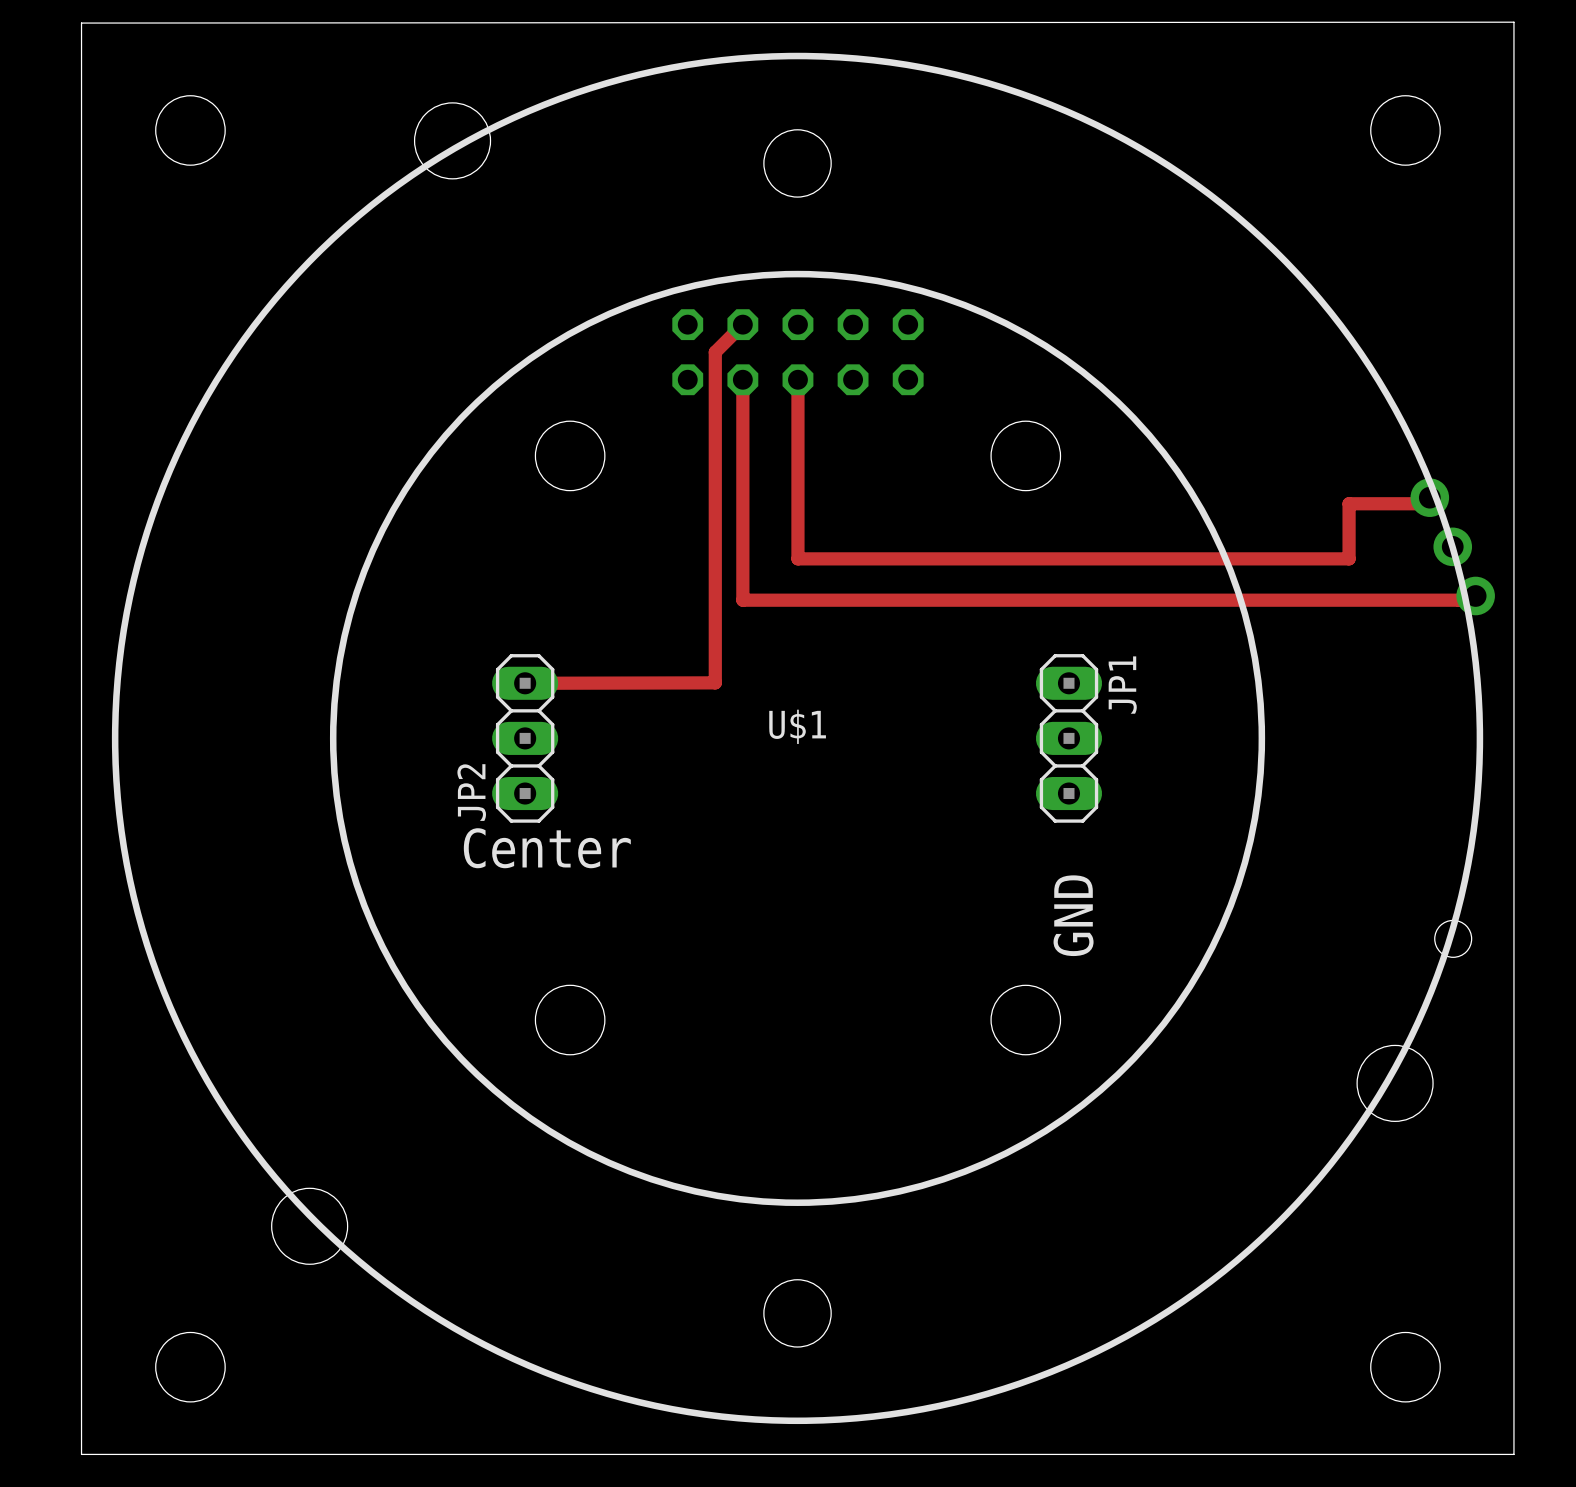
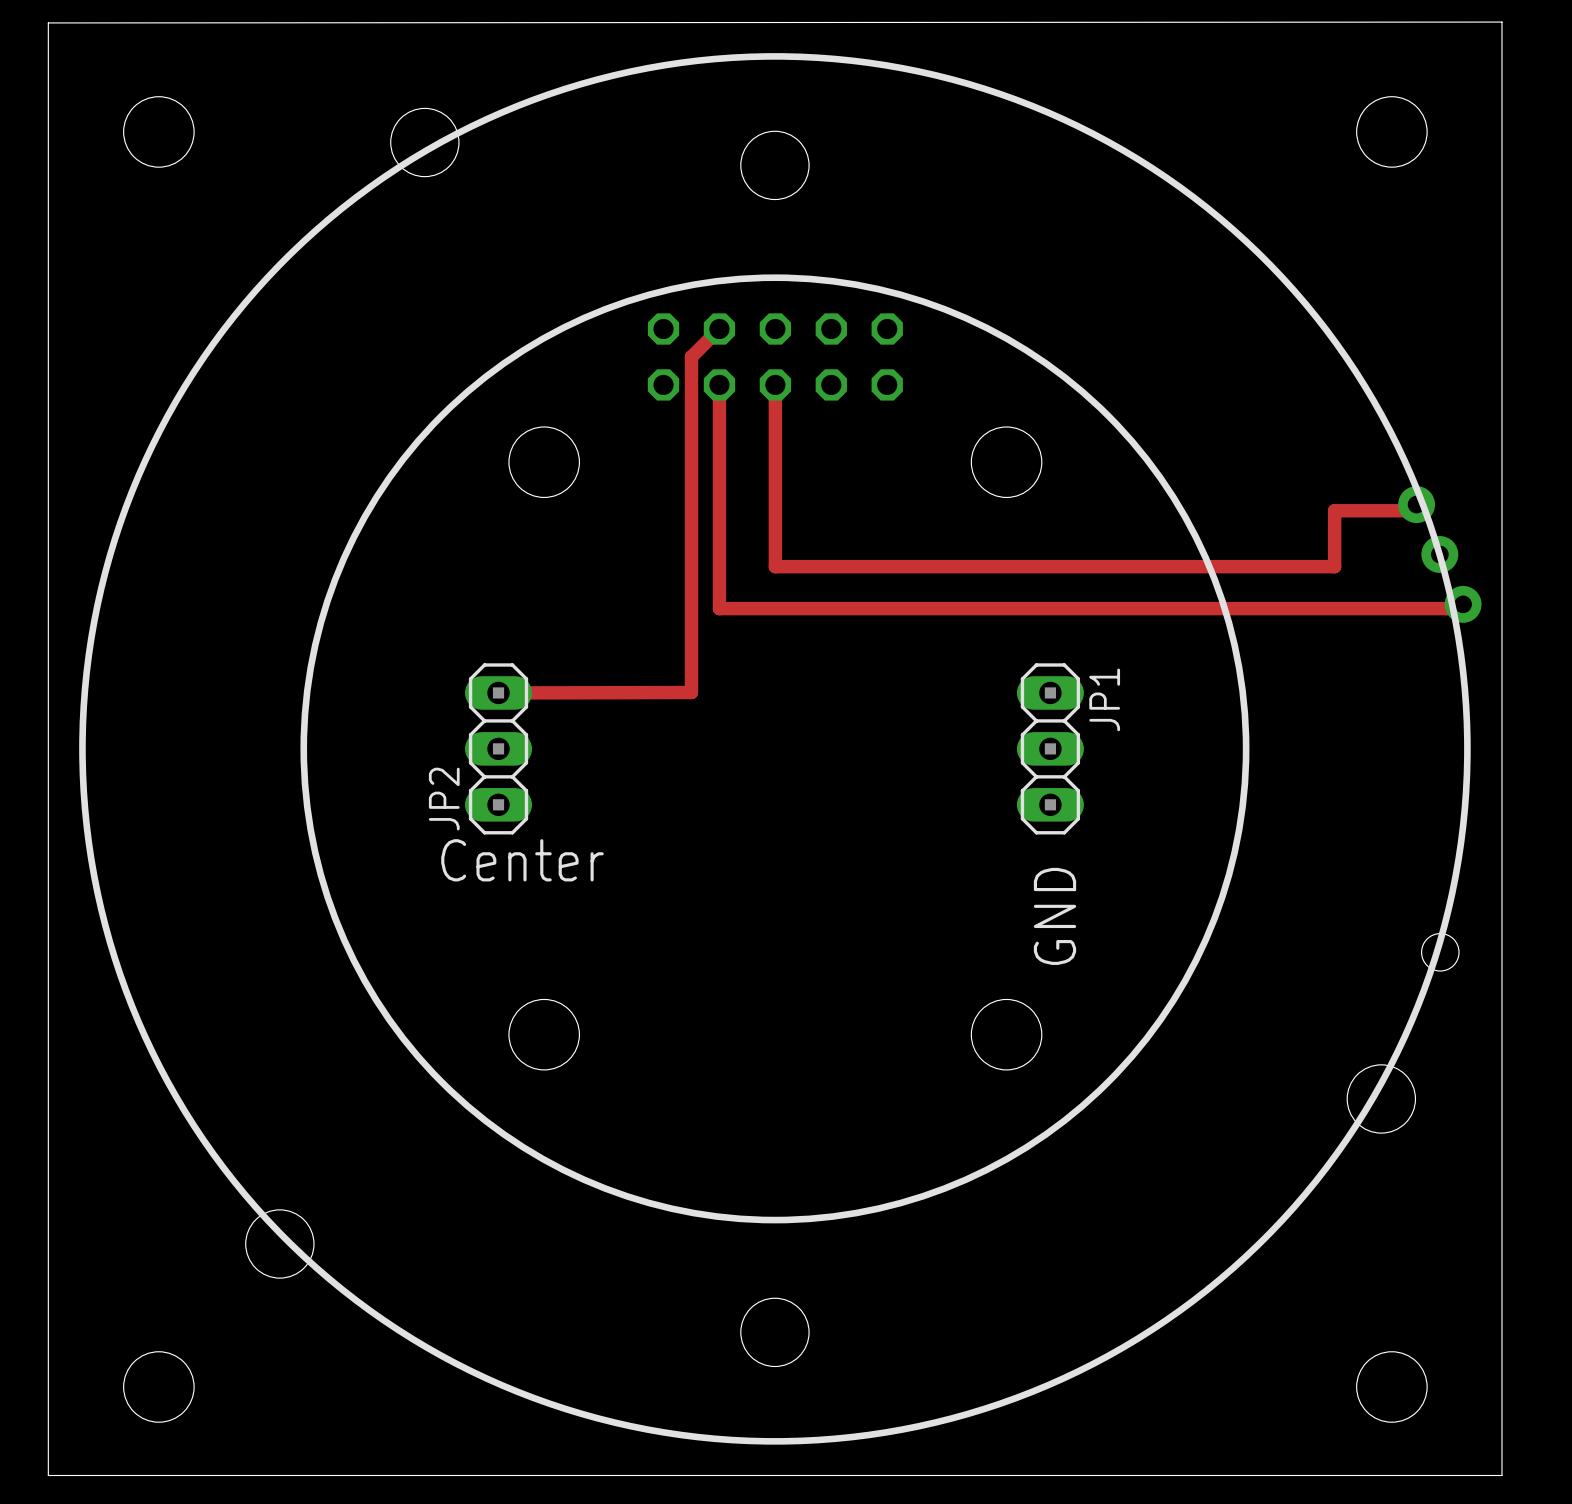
part: none -> (780, 748)
U$1: (803, 738) -> none

